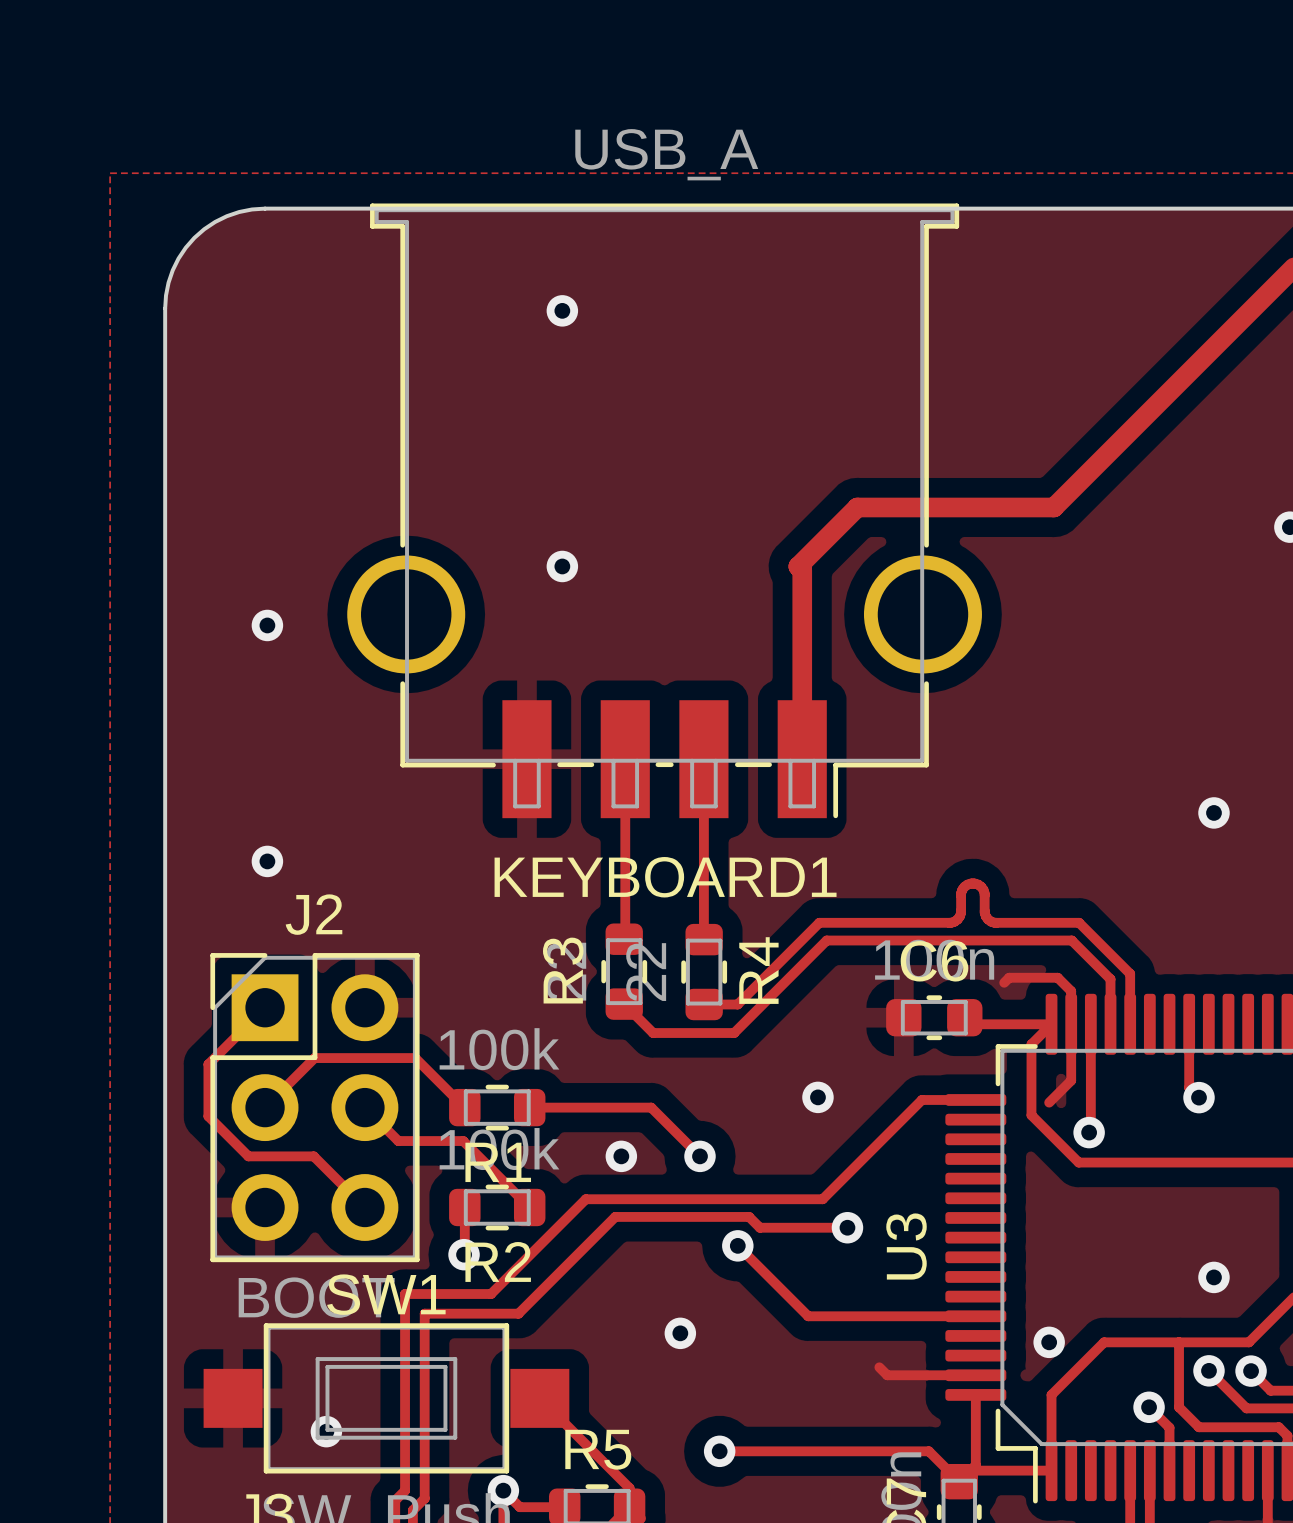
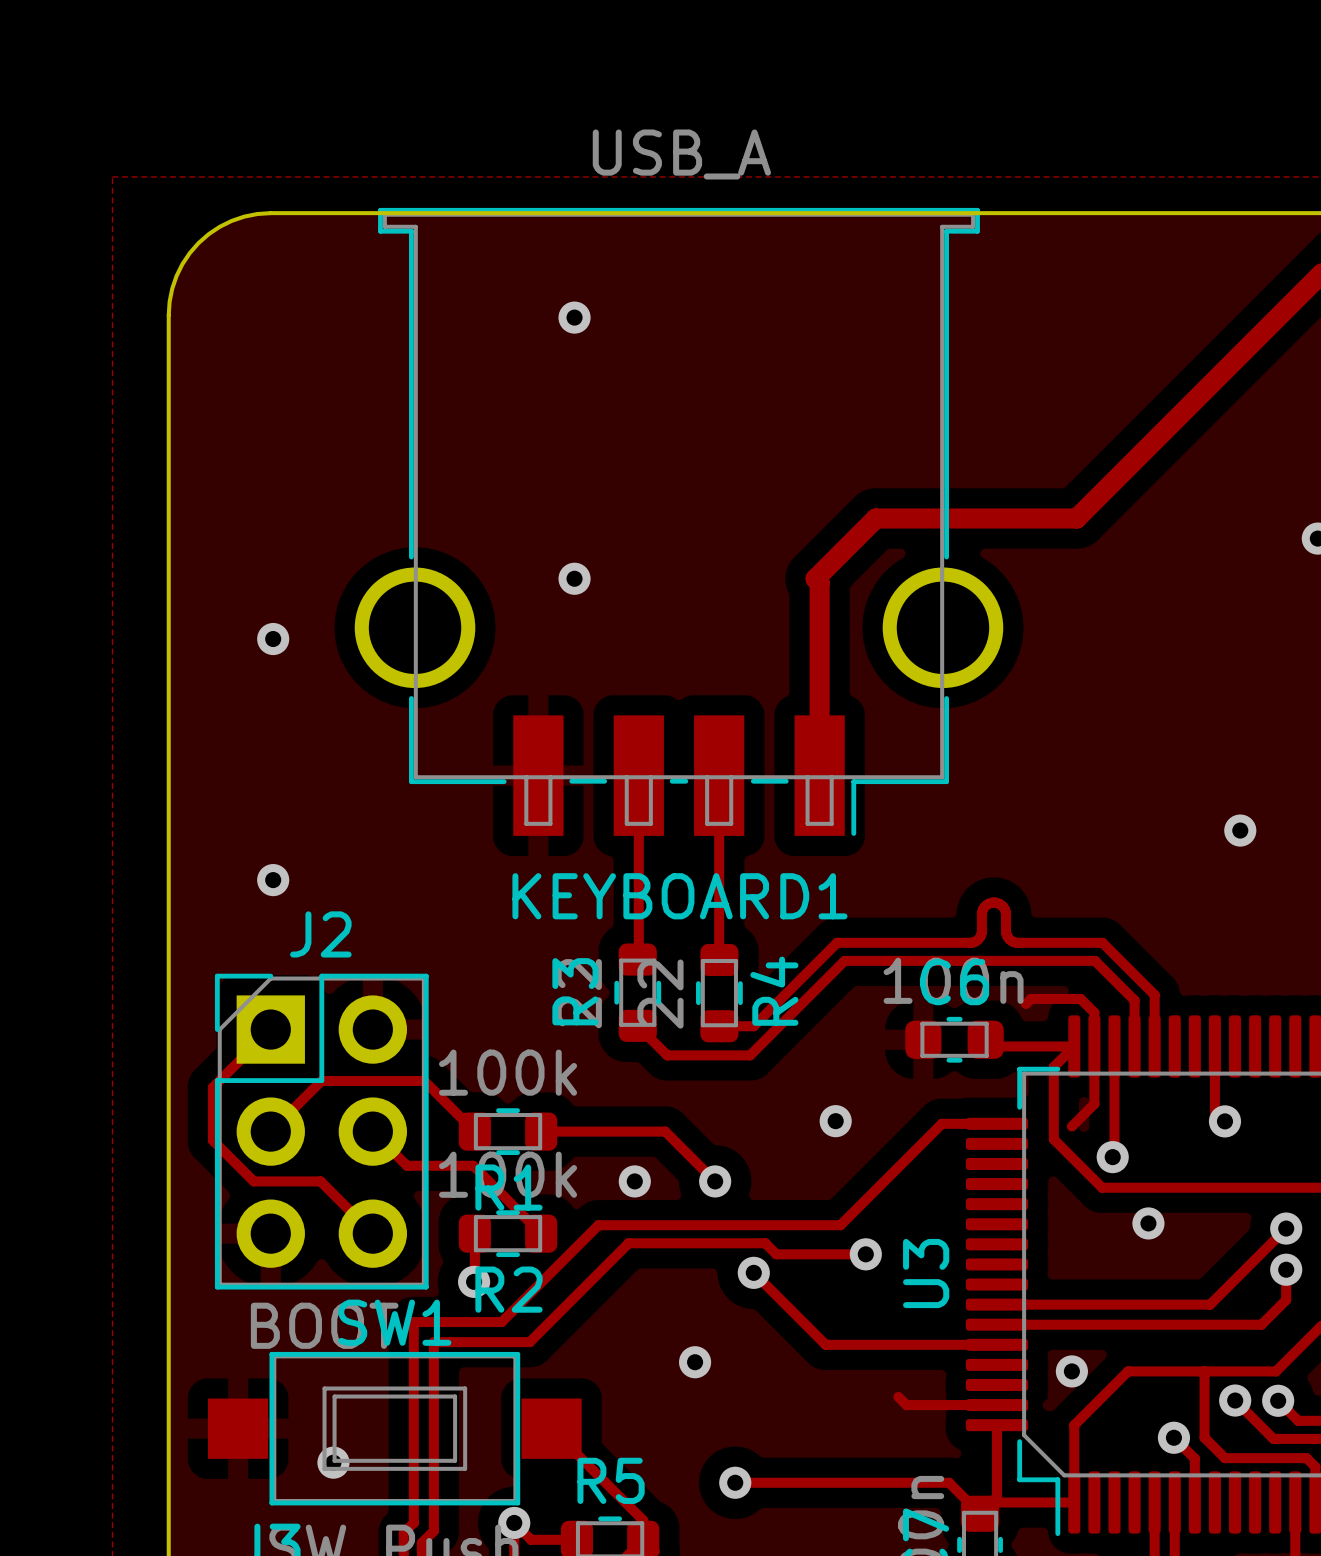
via: none -> (1148, 1223)
track: none -> (1286, 1228) (1210, 1304) (996, 1304)
via: none -> (1286, 1228)
track: none -> (1286, 1269) (1286, 1299) (1261, 1324) (996, 1324)
via: none -> (1286, 1269)
via: (1213, 1277) -> none

